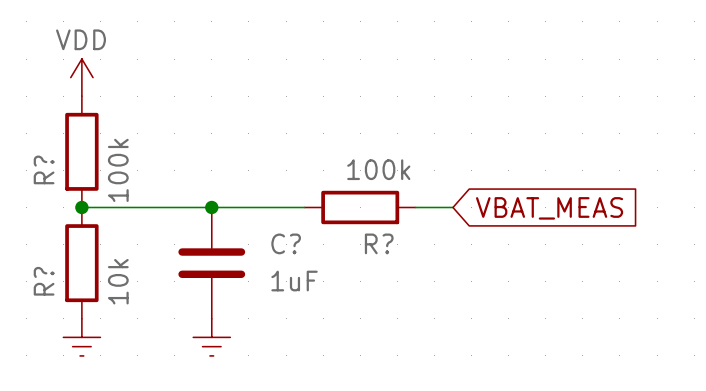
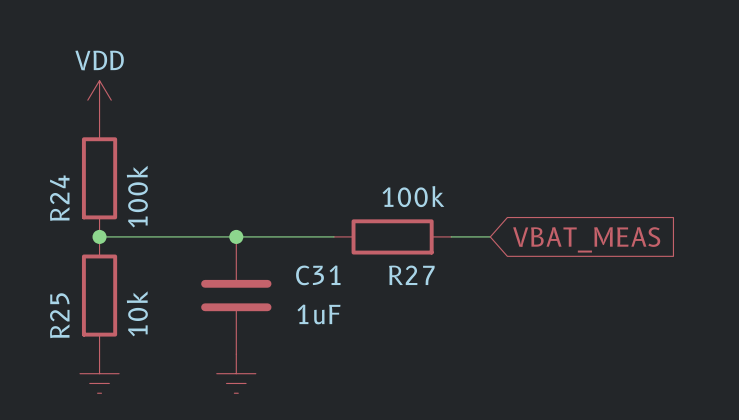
R? name: R? (44, 169) -> R24 (59, 198)
C? name: C? (286, 243) -> C31 (318, 275)
R? name: R? (379, 243) -> R27 (411, 275)
R? name: R? (44, 281) -> R25 (59, 315)

